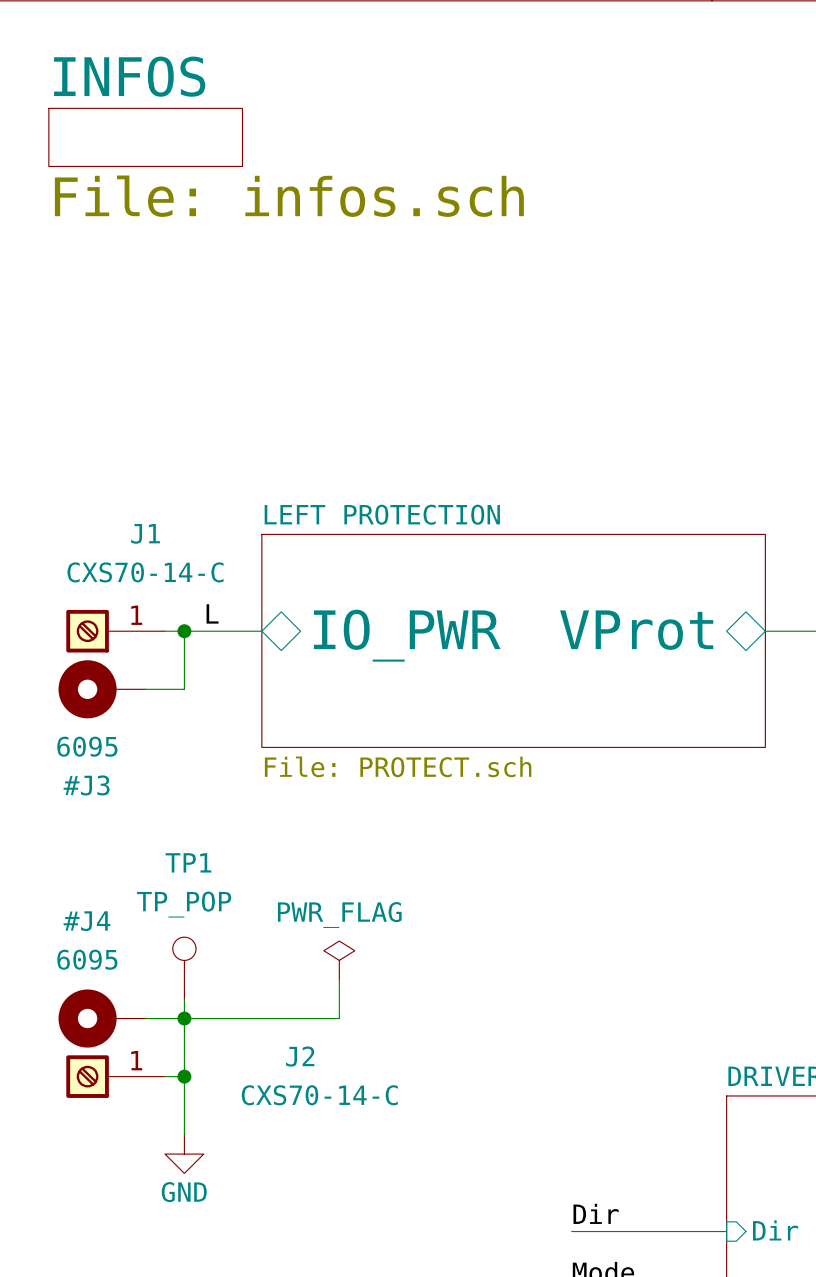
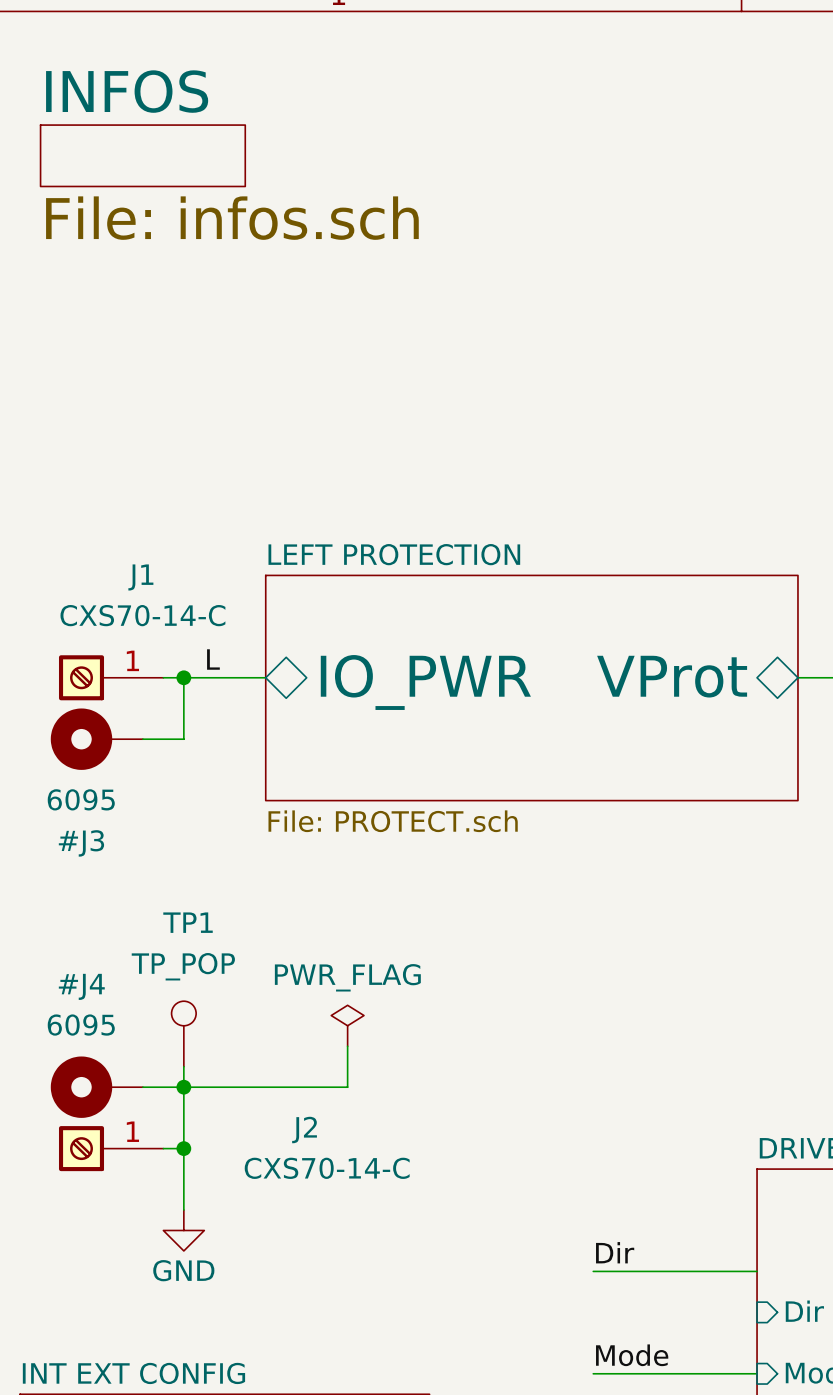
label position: Dir (596, 1213) -> Dir (615, 1252)
wire: (571, 1231) (726, 1231) -> (593, 1271) (757, 1271)

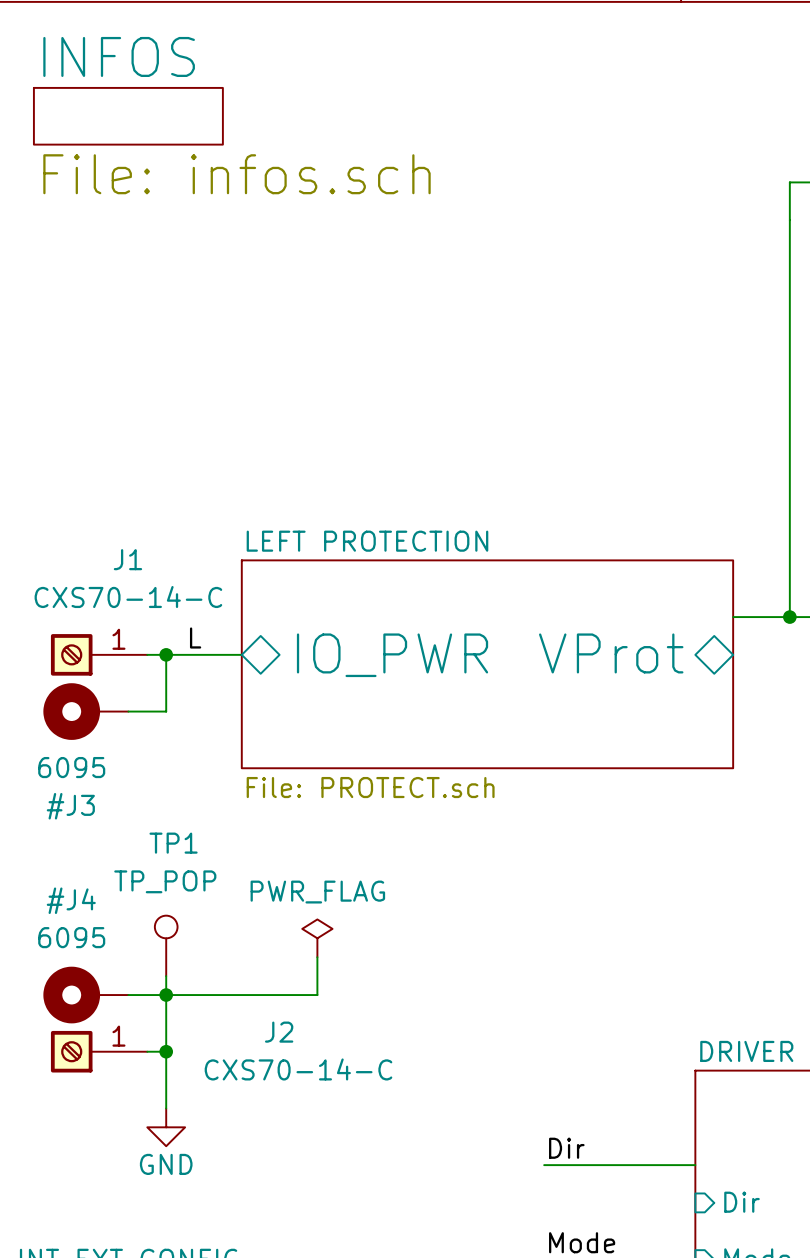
sheet INFOS position: (142, 155) -> (128, 116)
label position: L (213, 659) -> L (195, 638)
sheet pin position: VProt (672, 676) -> VProt (611, 653)
J1 position: (111, 677) -> (99, 654)
wire: (163, 677) (265, 677) -> (147, 654) (241, 654)
wire: (183, 677) (183, 718) -> none
junction position: (183, 677) -> (166, 654)
sheet pin position: IO_PWR (425, 682) -> IO_PWR (392, 655)
sheet LEFT PROTECTION position: (531, 688) -> (487, 664)
#J3 position: 6095 (96, 739) -> 6095 (85, 711)
wire: (142, 739) (183, 739) -> (128, 711) (166, 711) (166, 673)

